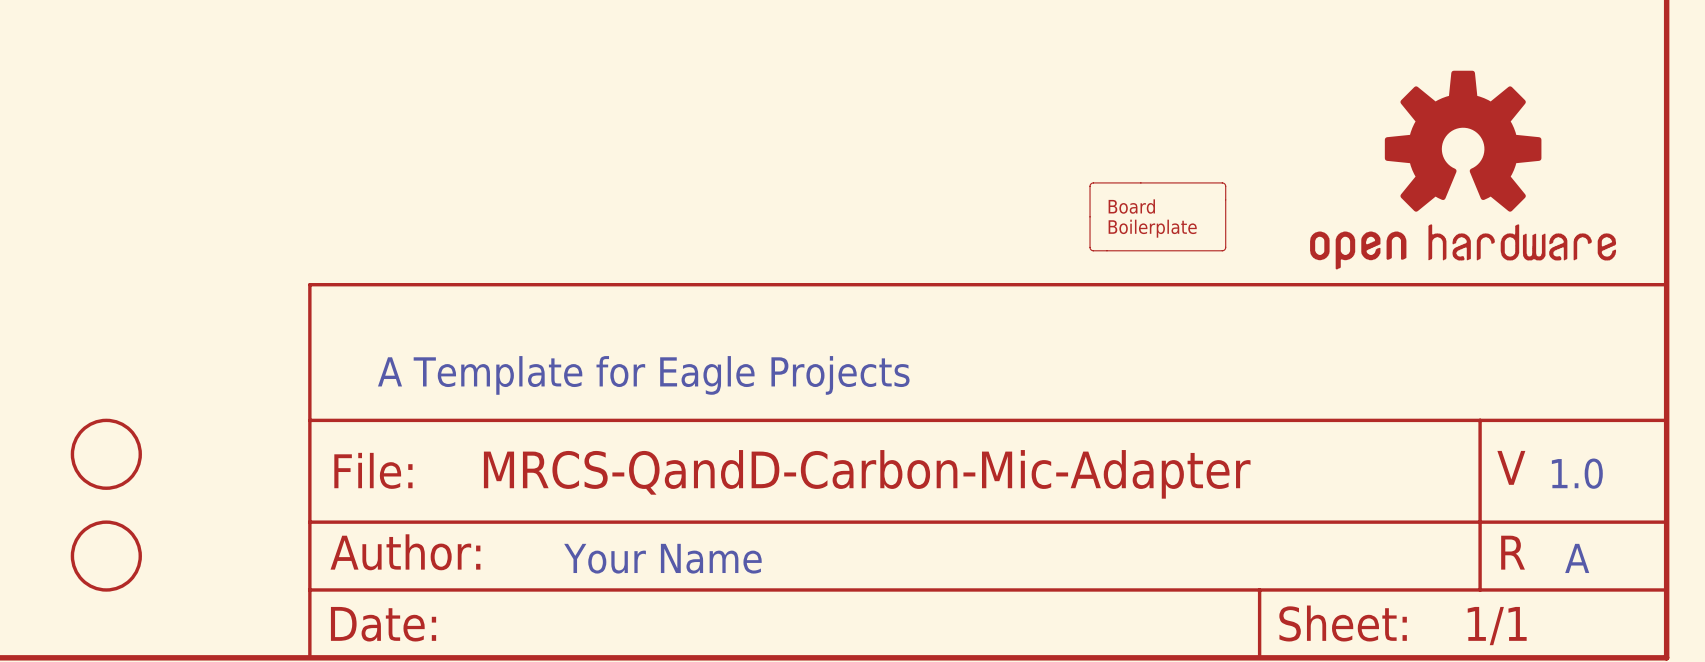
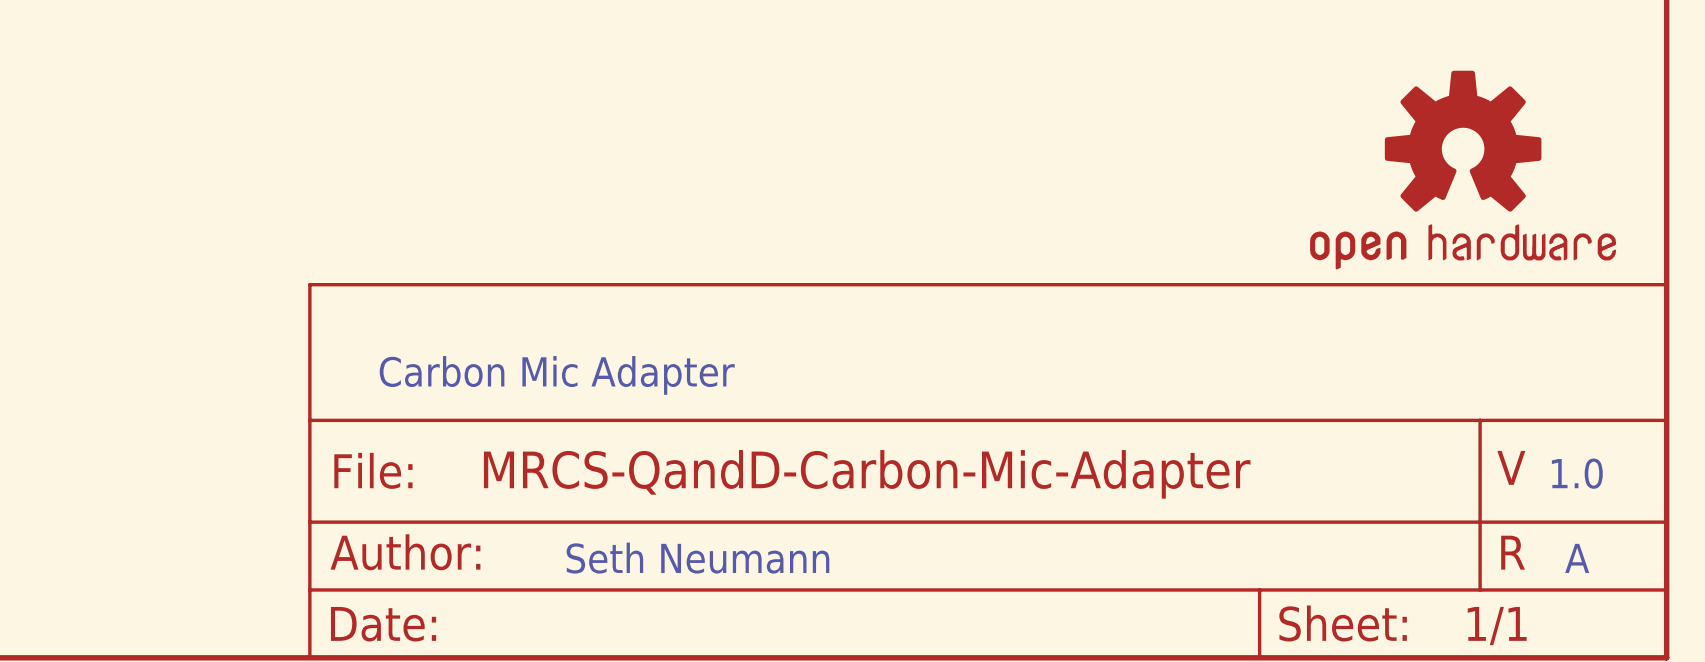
part: (1157, 216) -> none
text: A Template for Eagle Projects (643, 375) -> Carbon Mic Adapter (557, 375)
part: (106, 454) -> none
part: (106, 556) -> none
text: Your Name (662, 558) -> Seth Neumann (697, 558)

